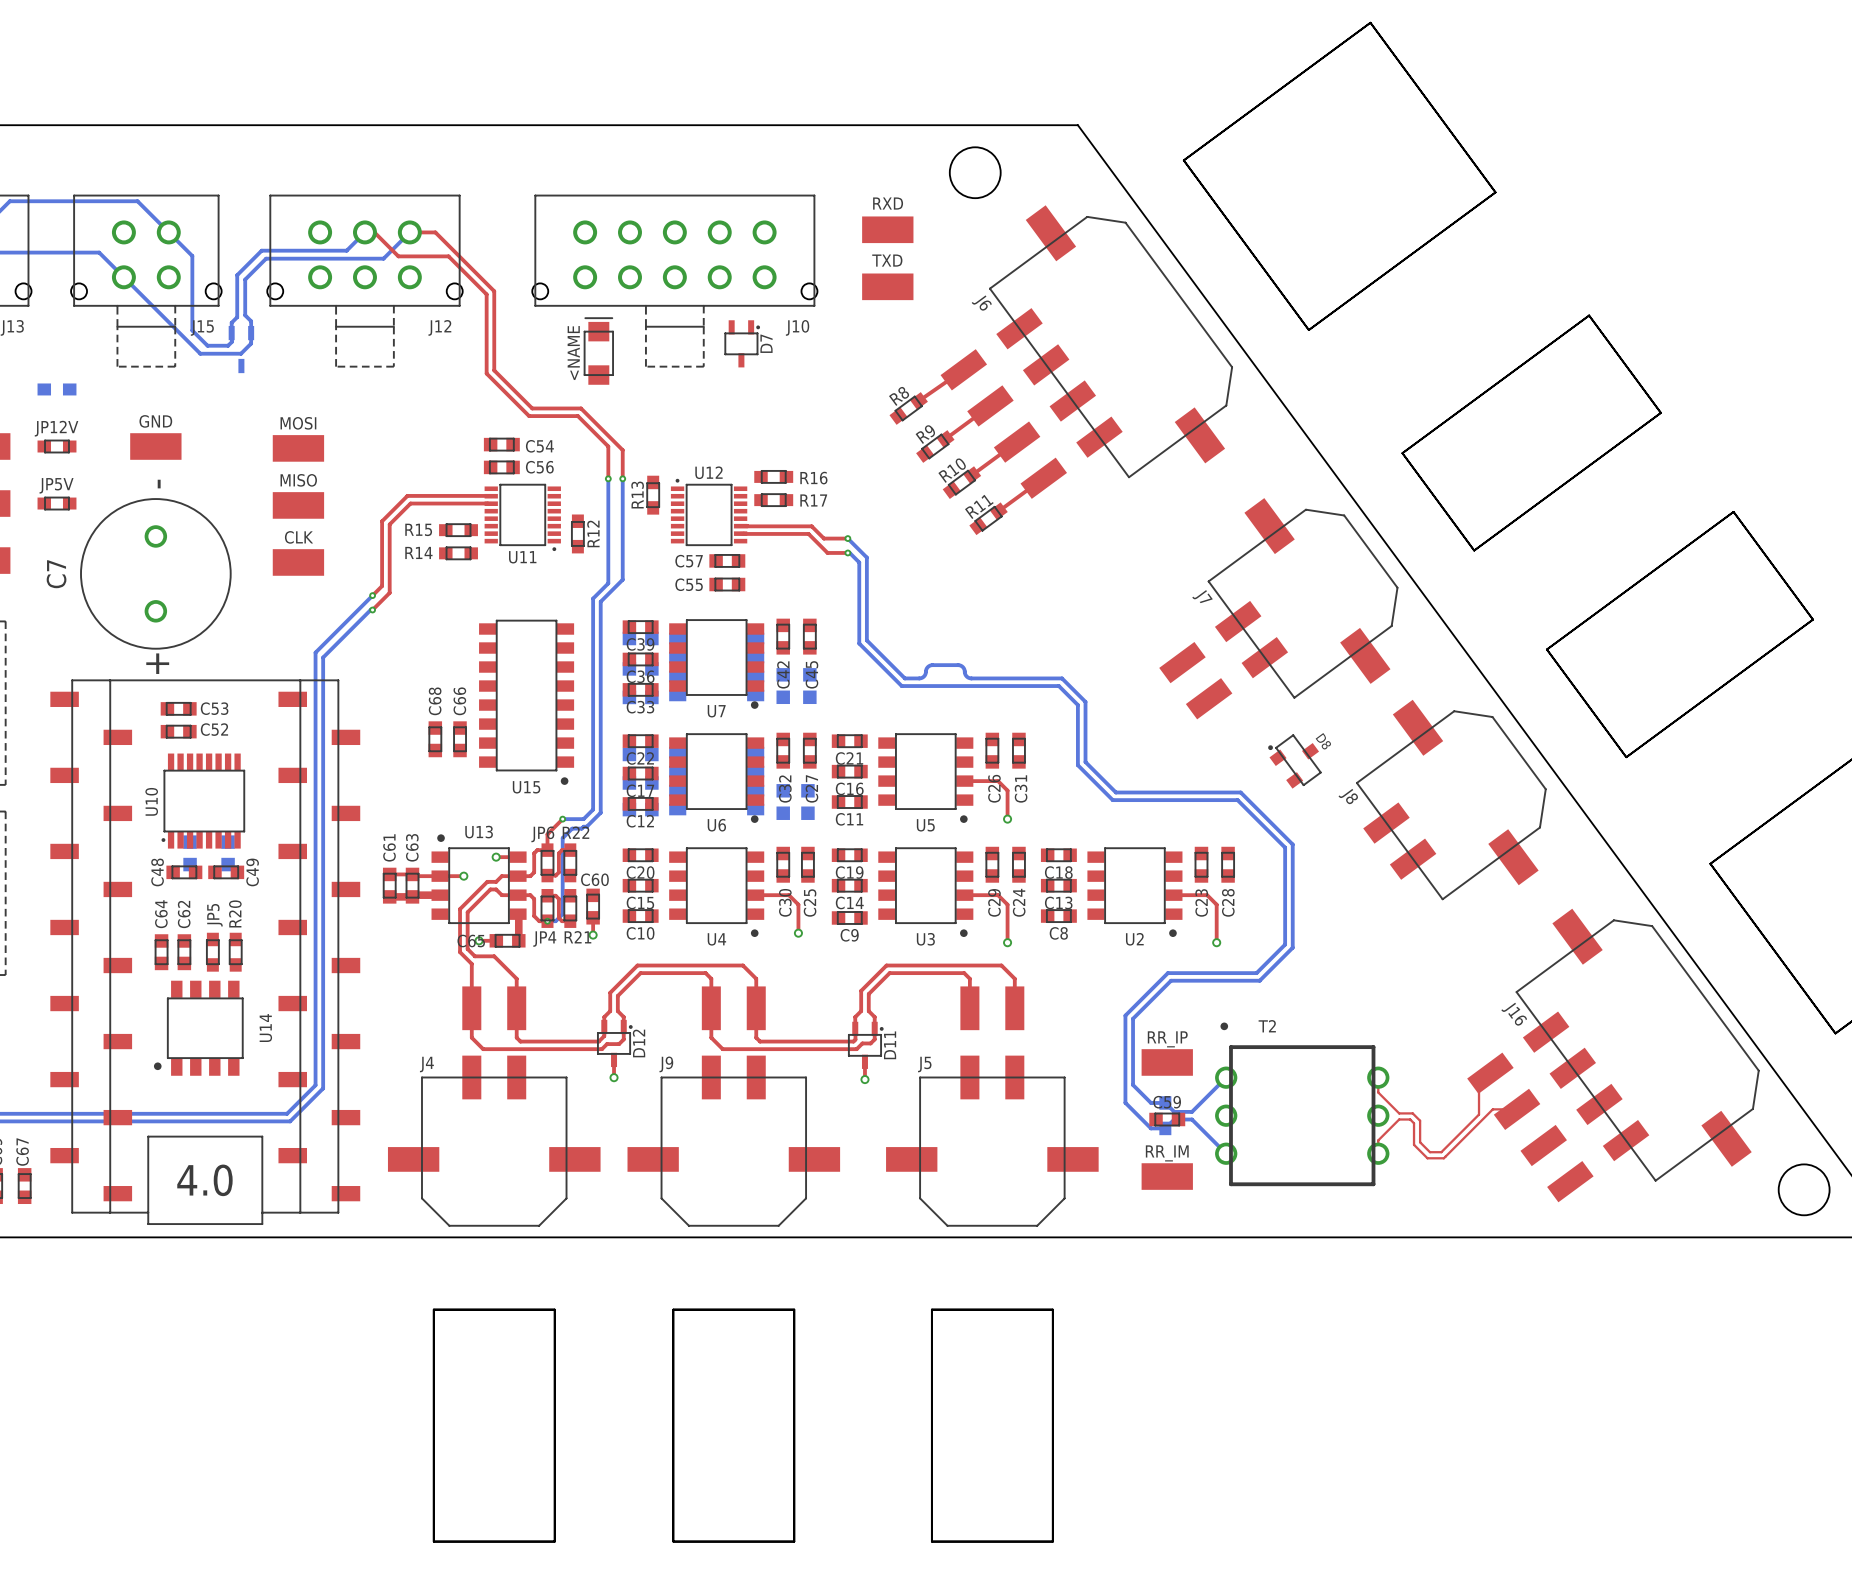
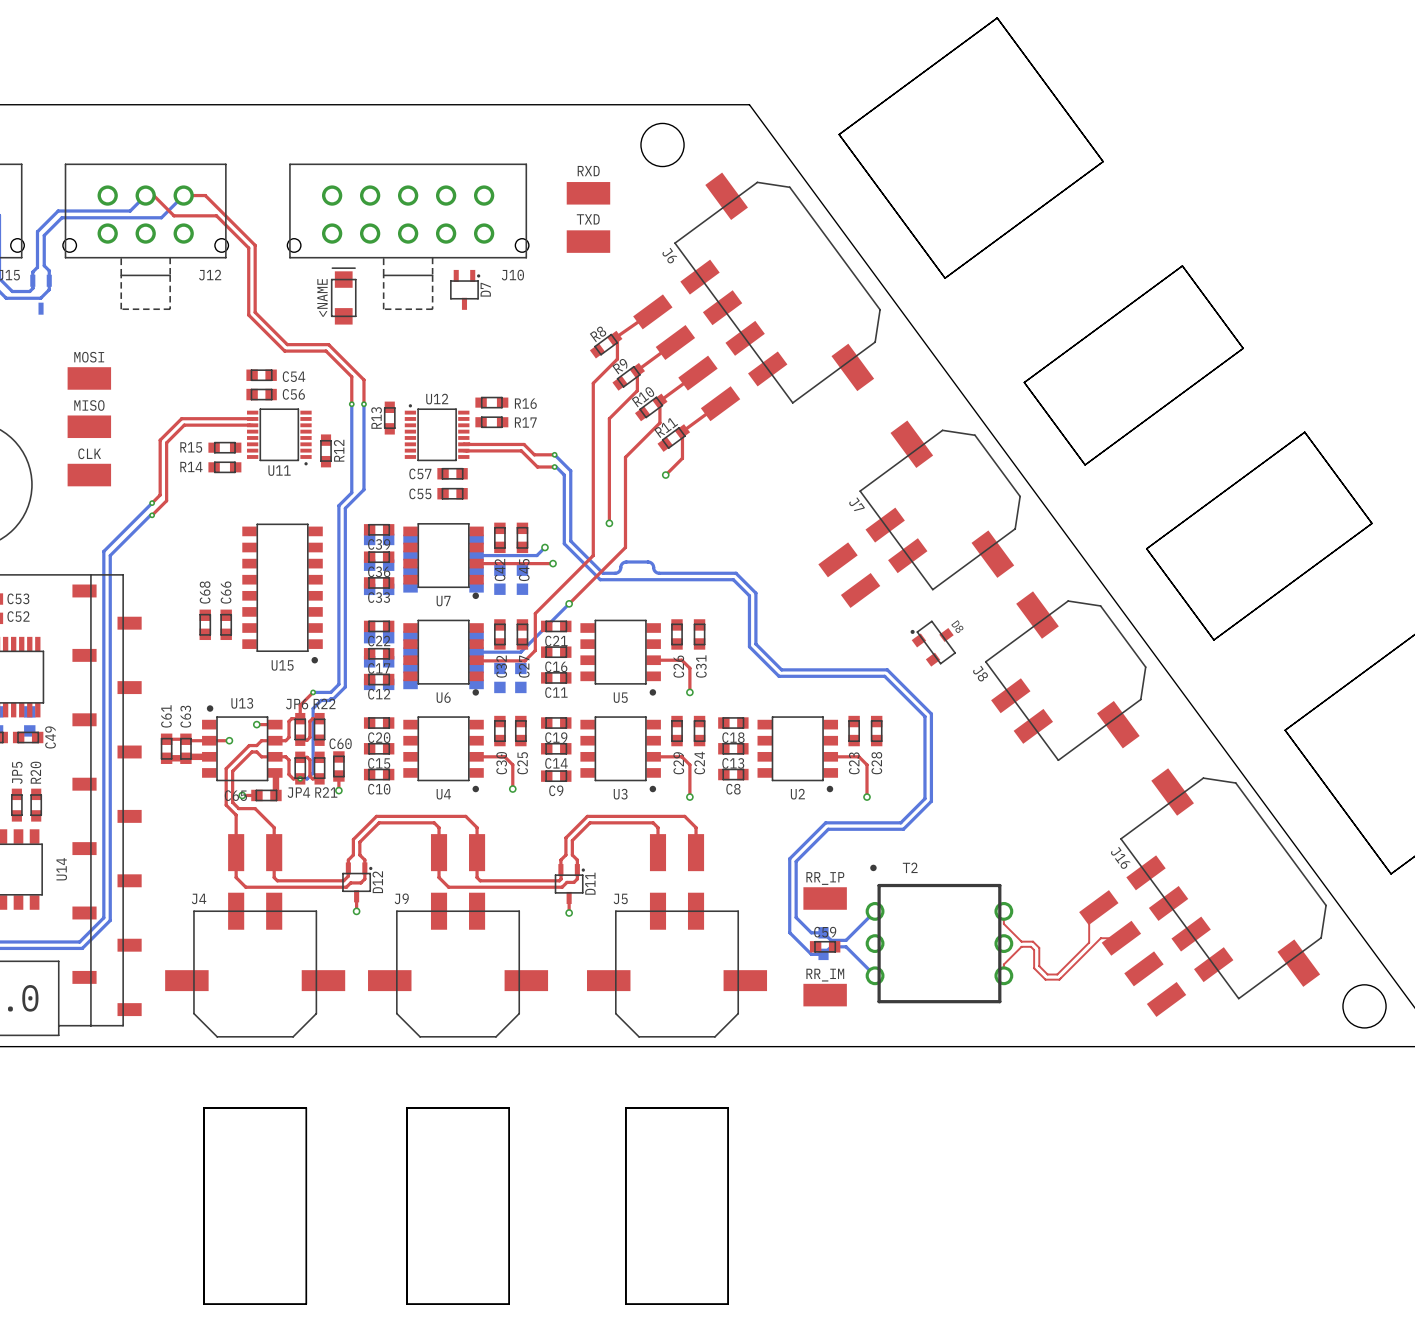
top track: none -> (614, 338) (617, 340) (617, 359) (593, 383) (593, 555) (535, 613) (535, 650) (525, 660) (476, 660)
top track: none -> (637, 370) (637, 390) (609, 418) (609, 523)
top track: none -> (659, 401) (659, 422) (625, 457) (625, 547) (569, 603)
top track: none -> (682, 431) (682, 458) (665, 475)
via: none -> (665, 475)
via: none -> (609, 523)
bottom track: none -> (544, 547) (536, 555) (476, 555)
via: none -> (544, 547)
top track: none -> (476, 563) (553, 563)
via: none -> (553, 563)
bottom track: none -> (569, 603) (520, 652) (476, 652)
via: none -> (569, 603)

